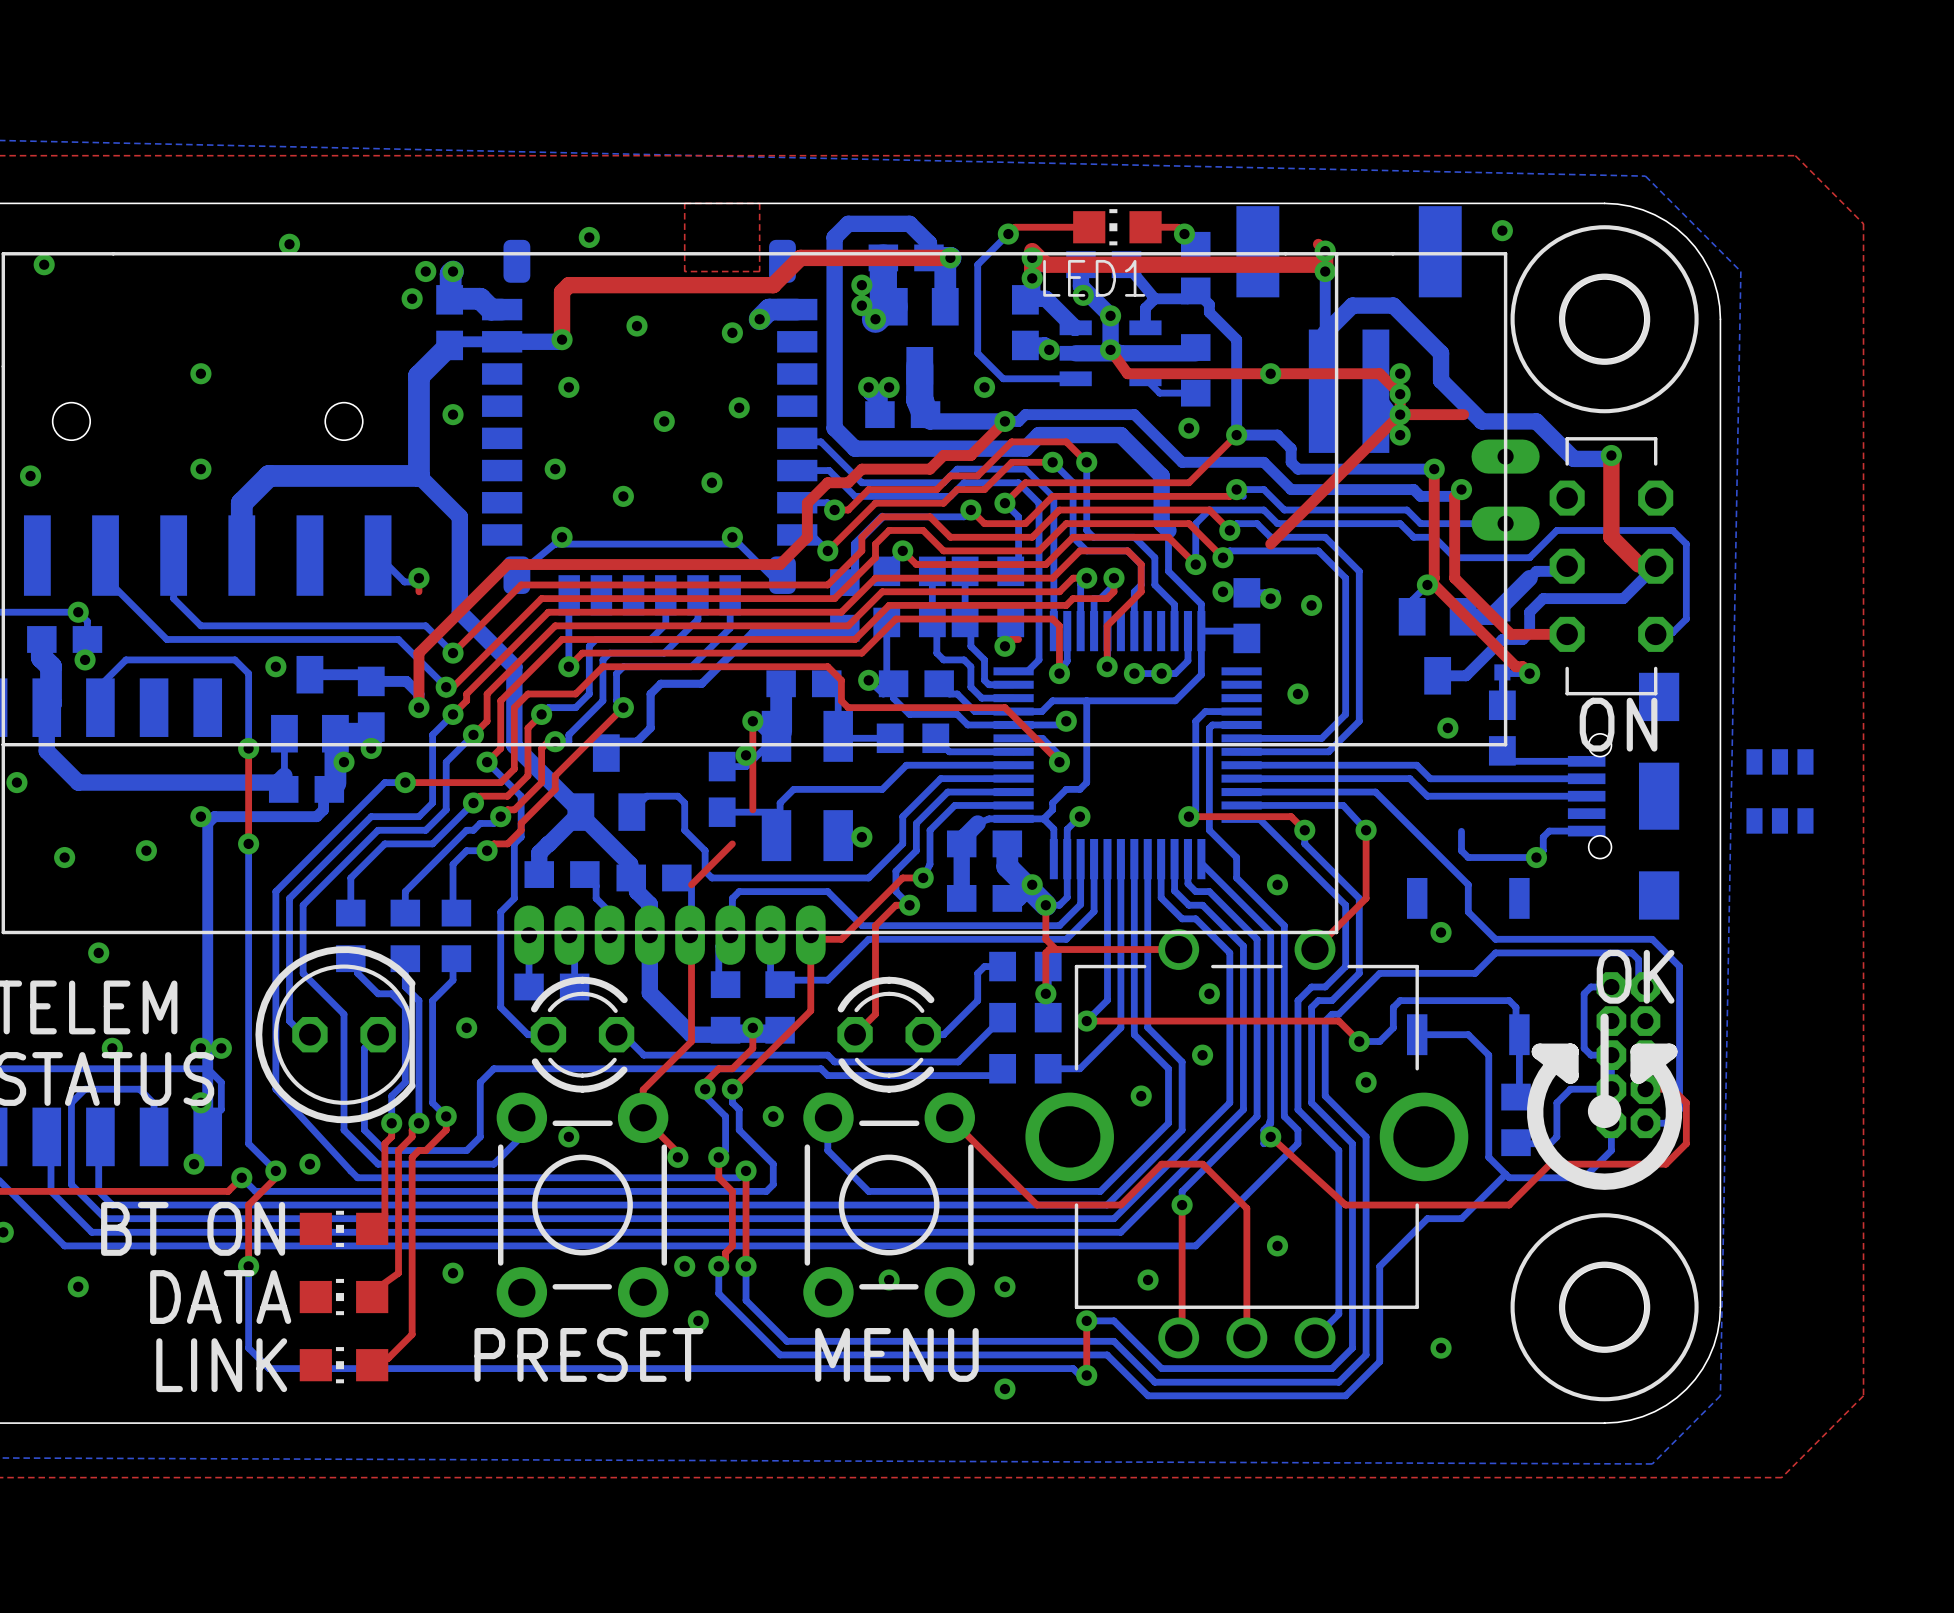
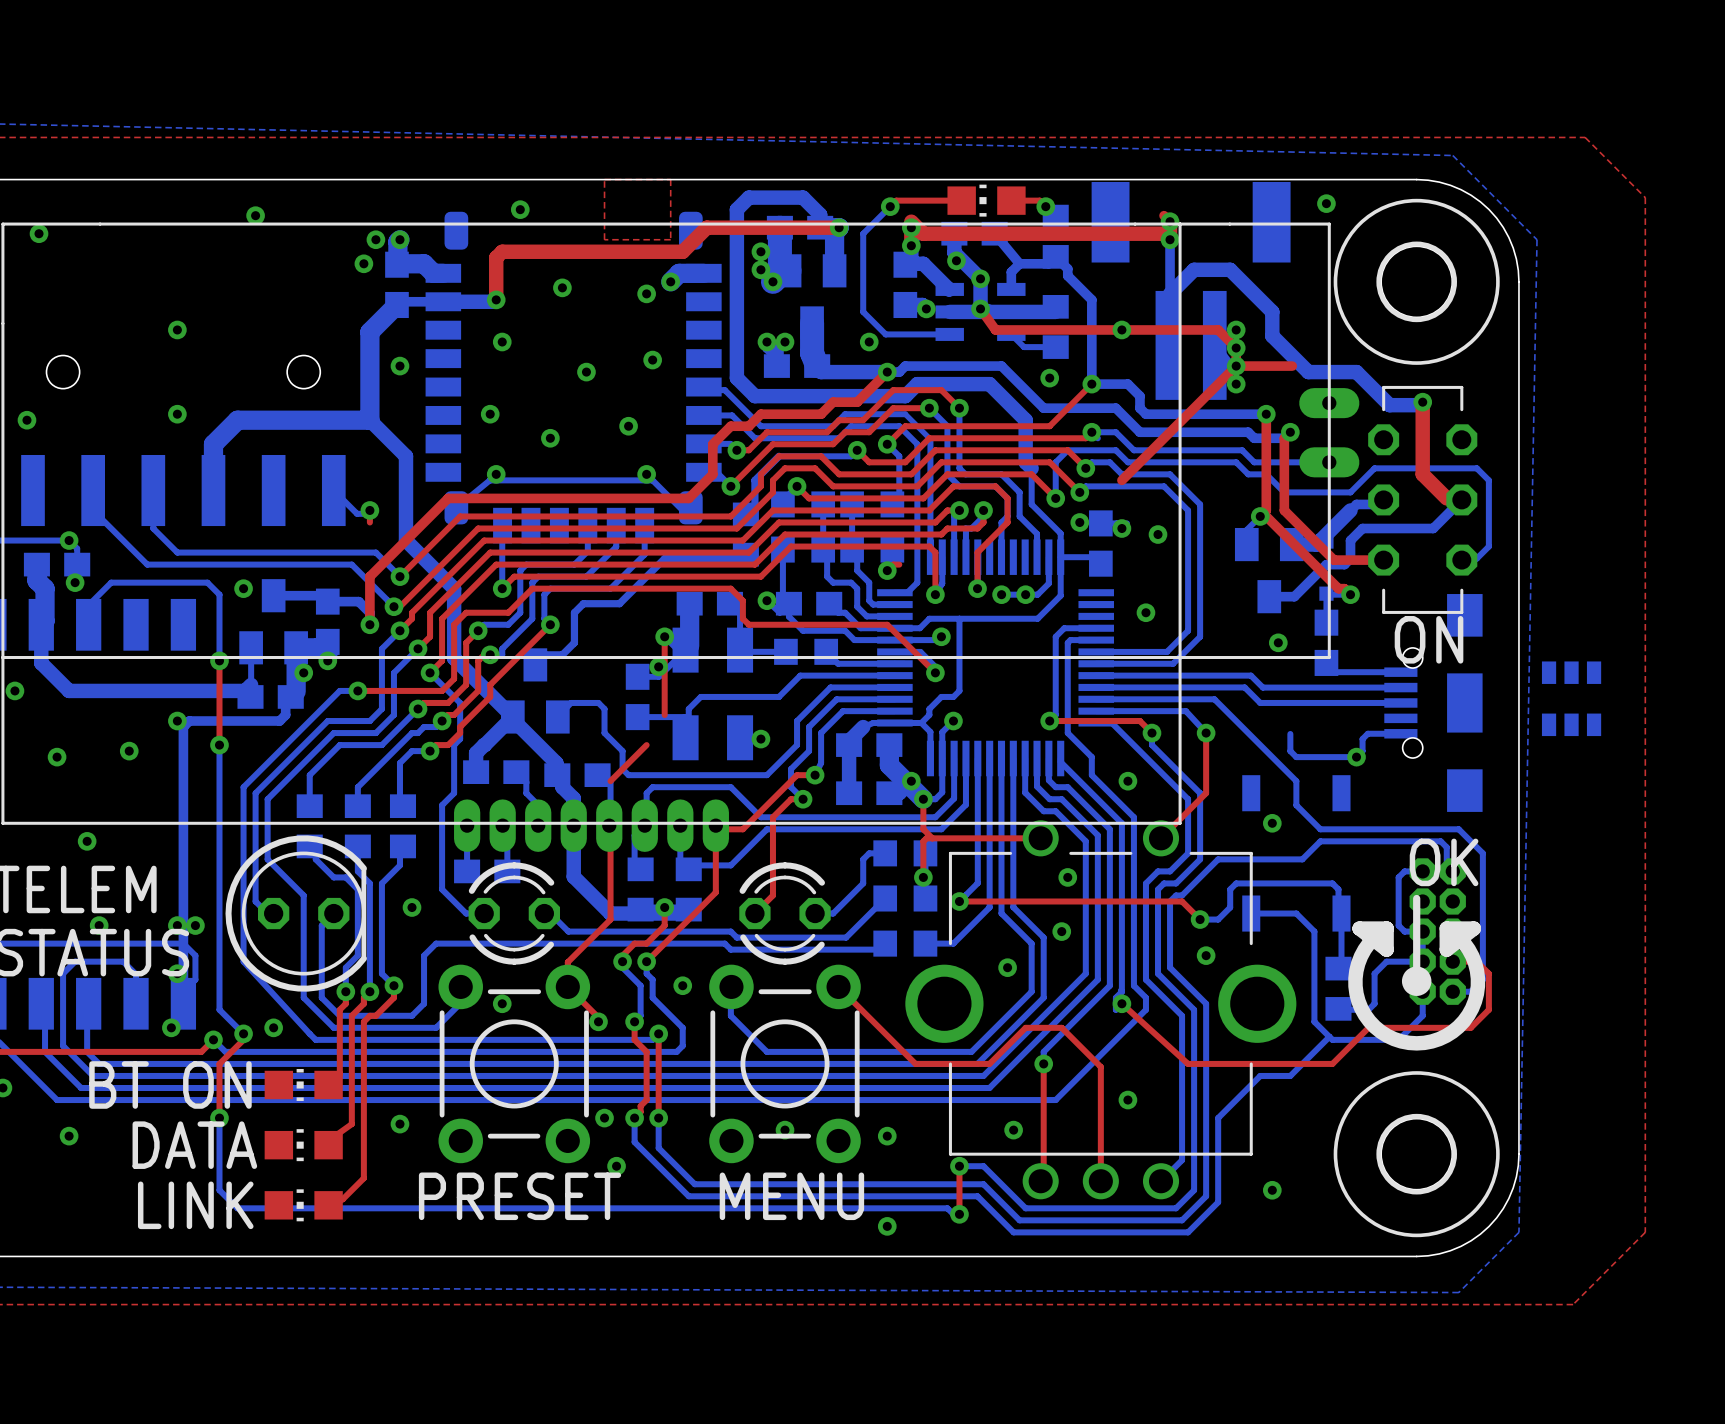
LED1 name: LED1 (1094, 278) -> none

